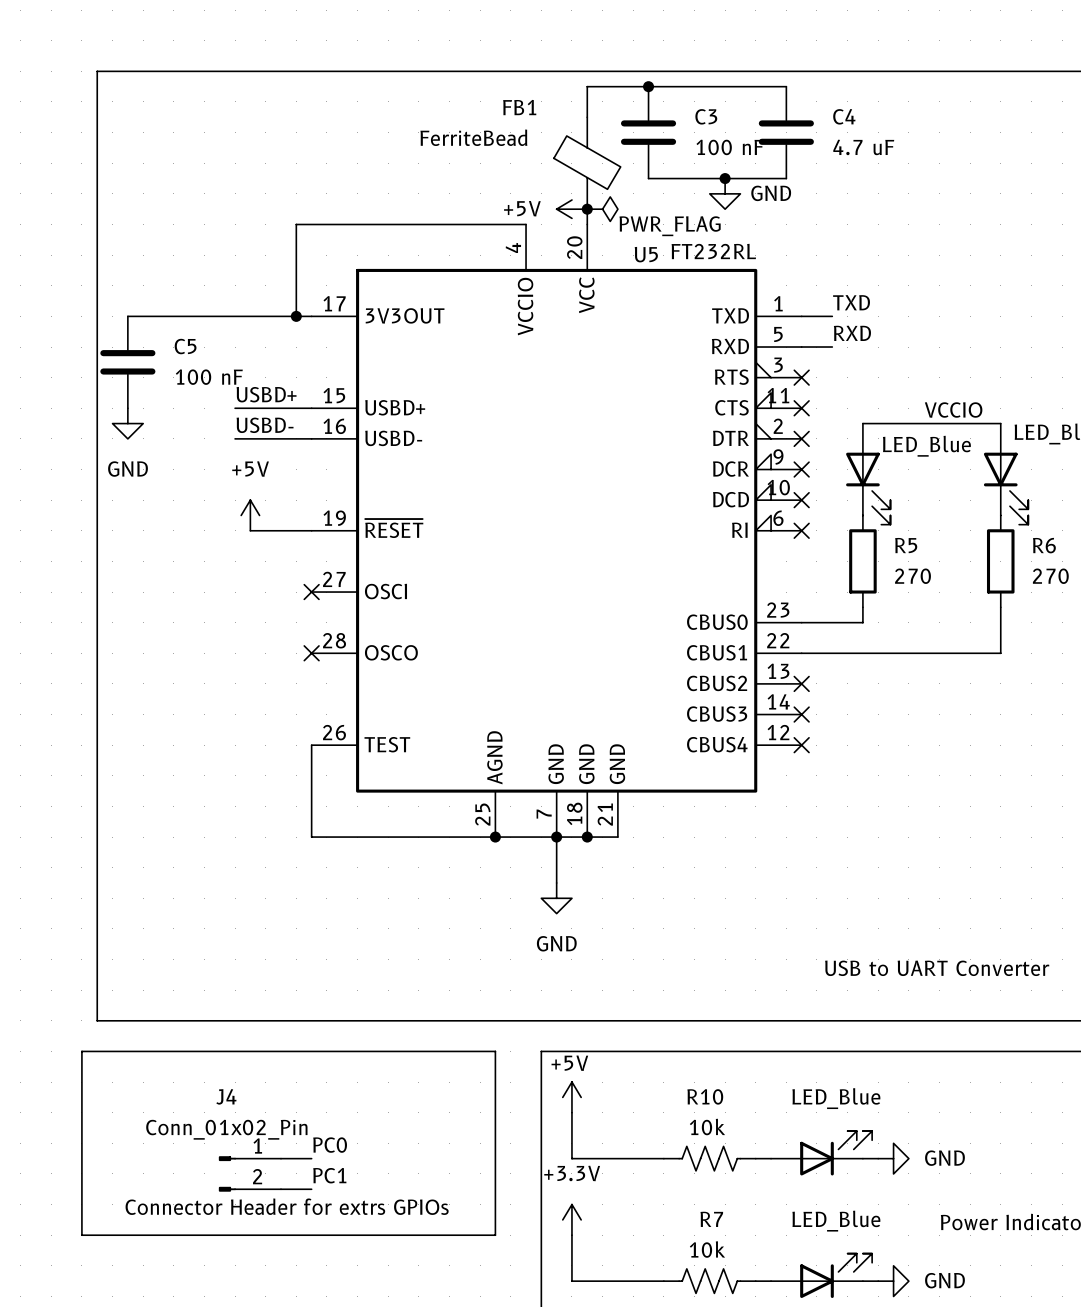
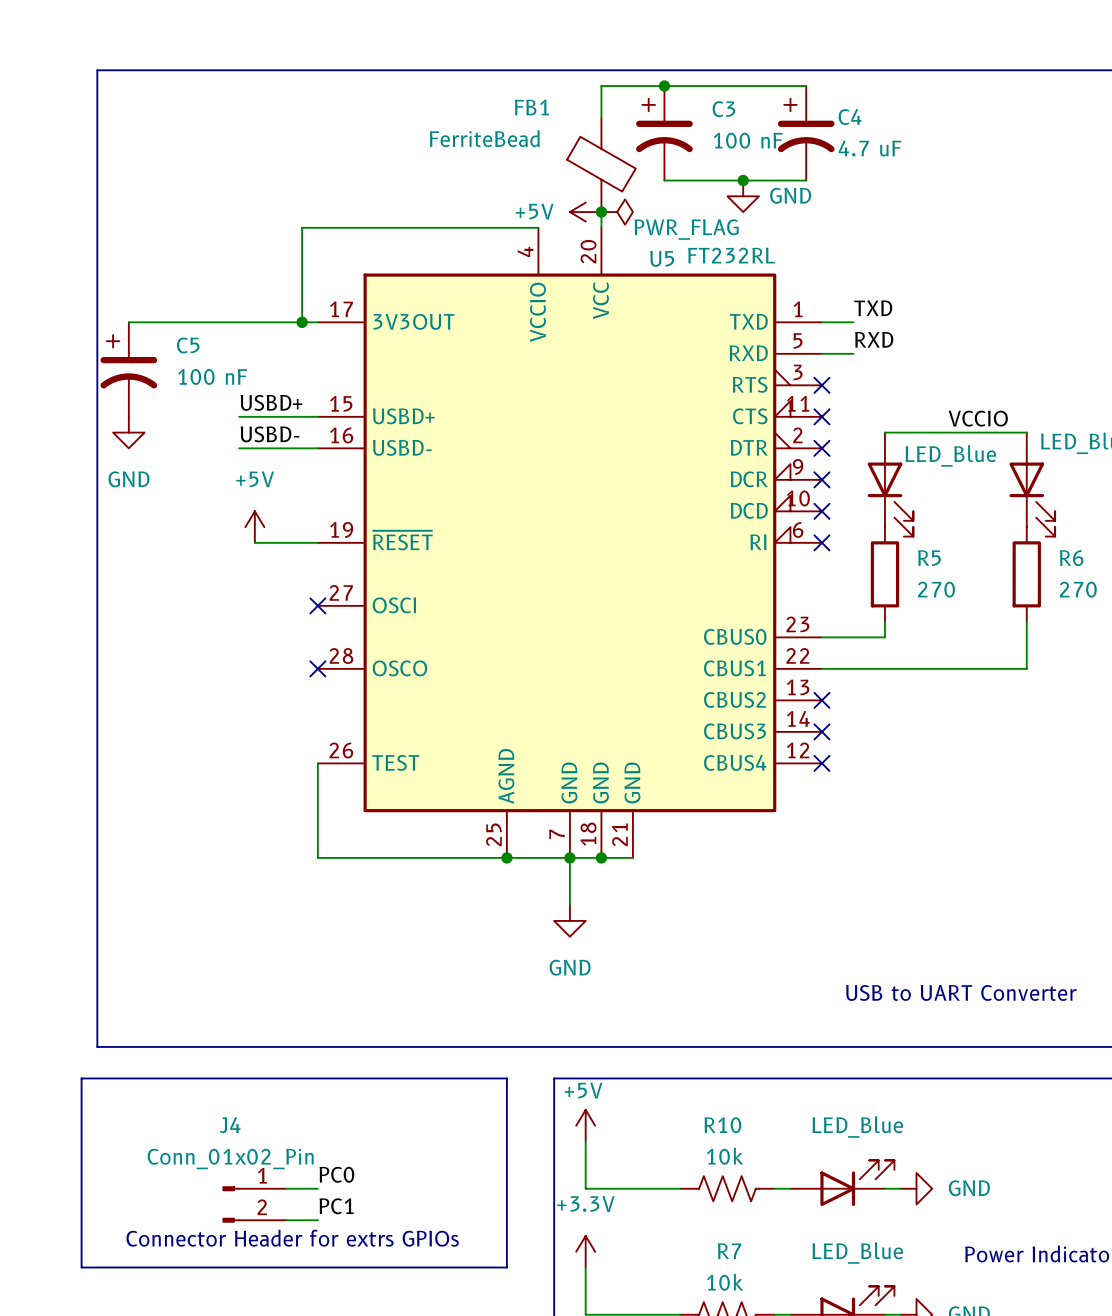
C3 symbol: [620, 86, 677, 179] -> [636, 86, 693, 181]
C4 symbol: [758, 86, 814, 179] -> [777, 86, 835, 181]
C5 symbol: [100, 316, 156, 409] -> [100, 322, 158, 417]

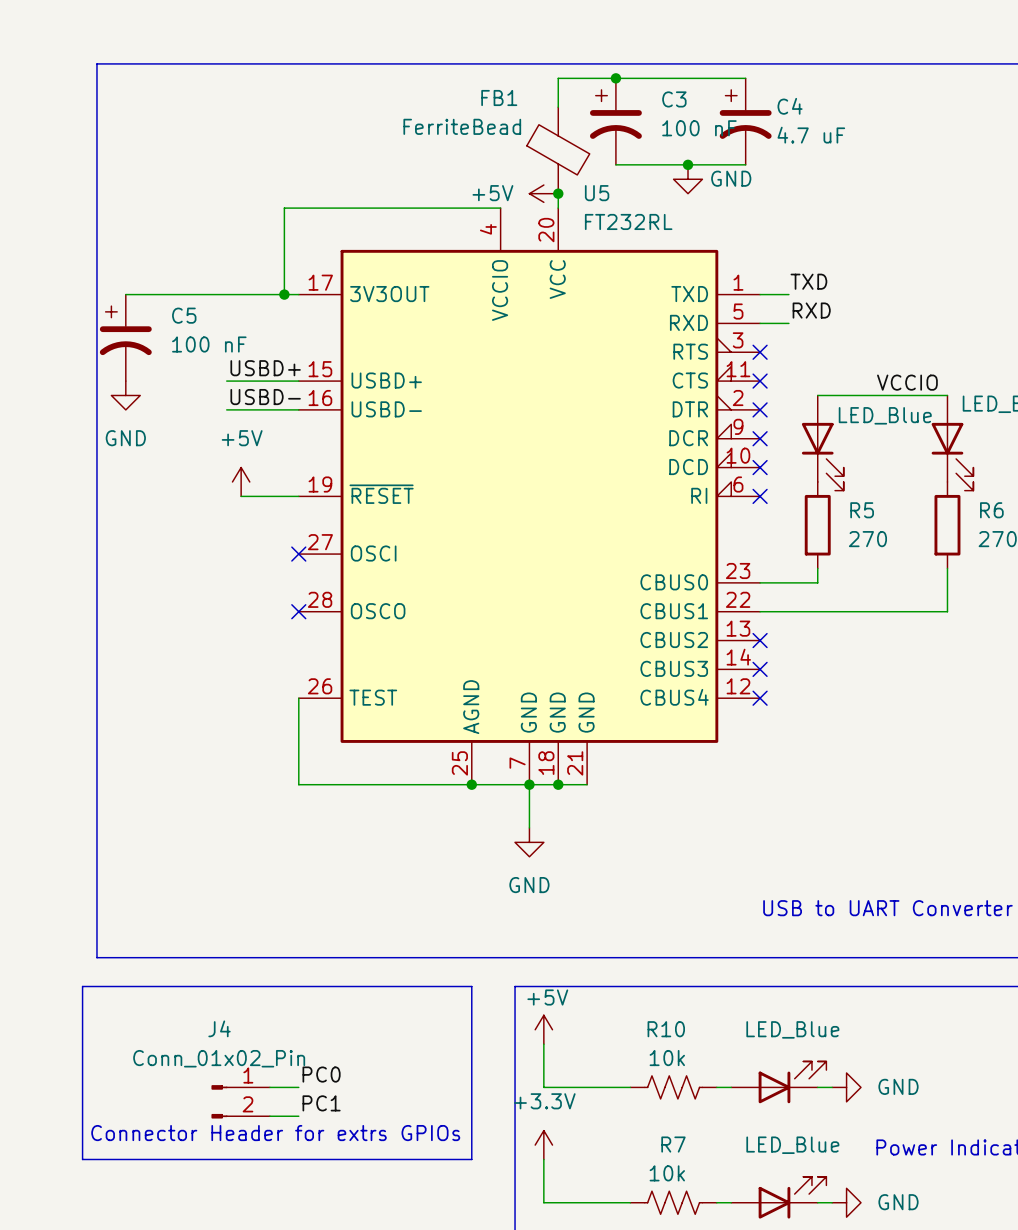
power symbol: PWR_FLAG (617, 212) -> none
U5 value position: FT232RL (731, 255) -> FT232RL (628, 221)
U5 name position: U5 (662, 258) -> U5 (597, 193)

